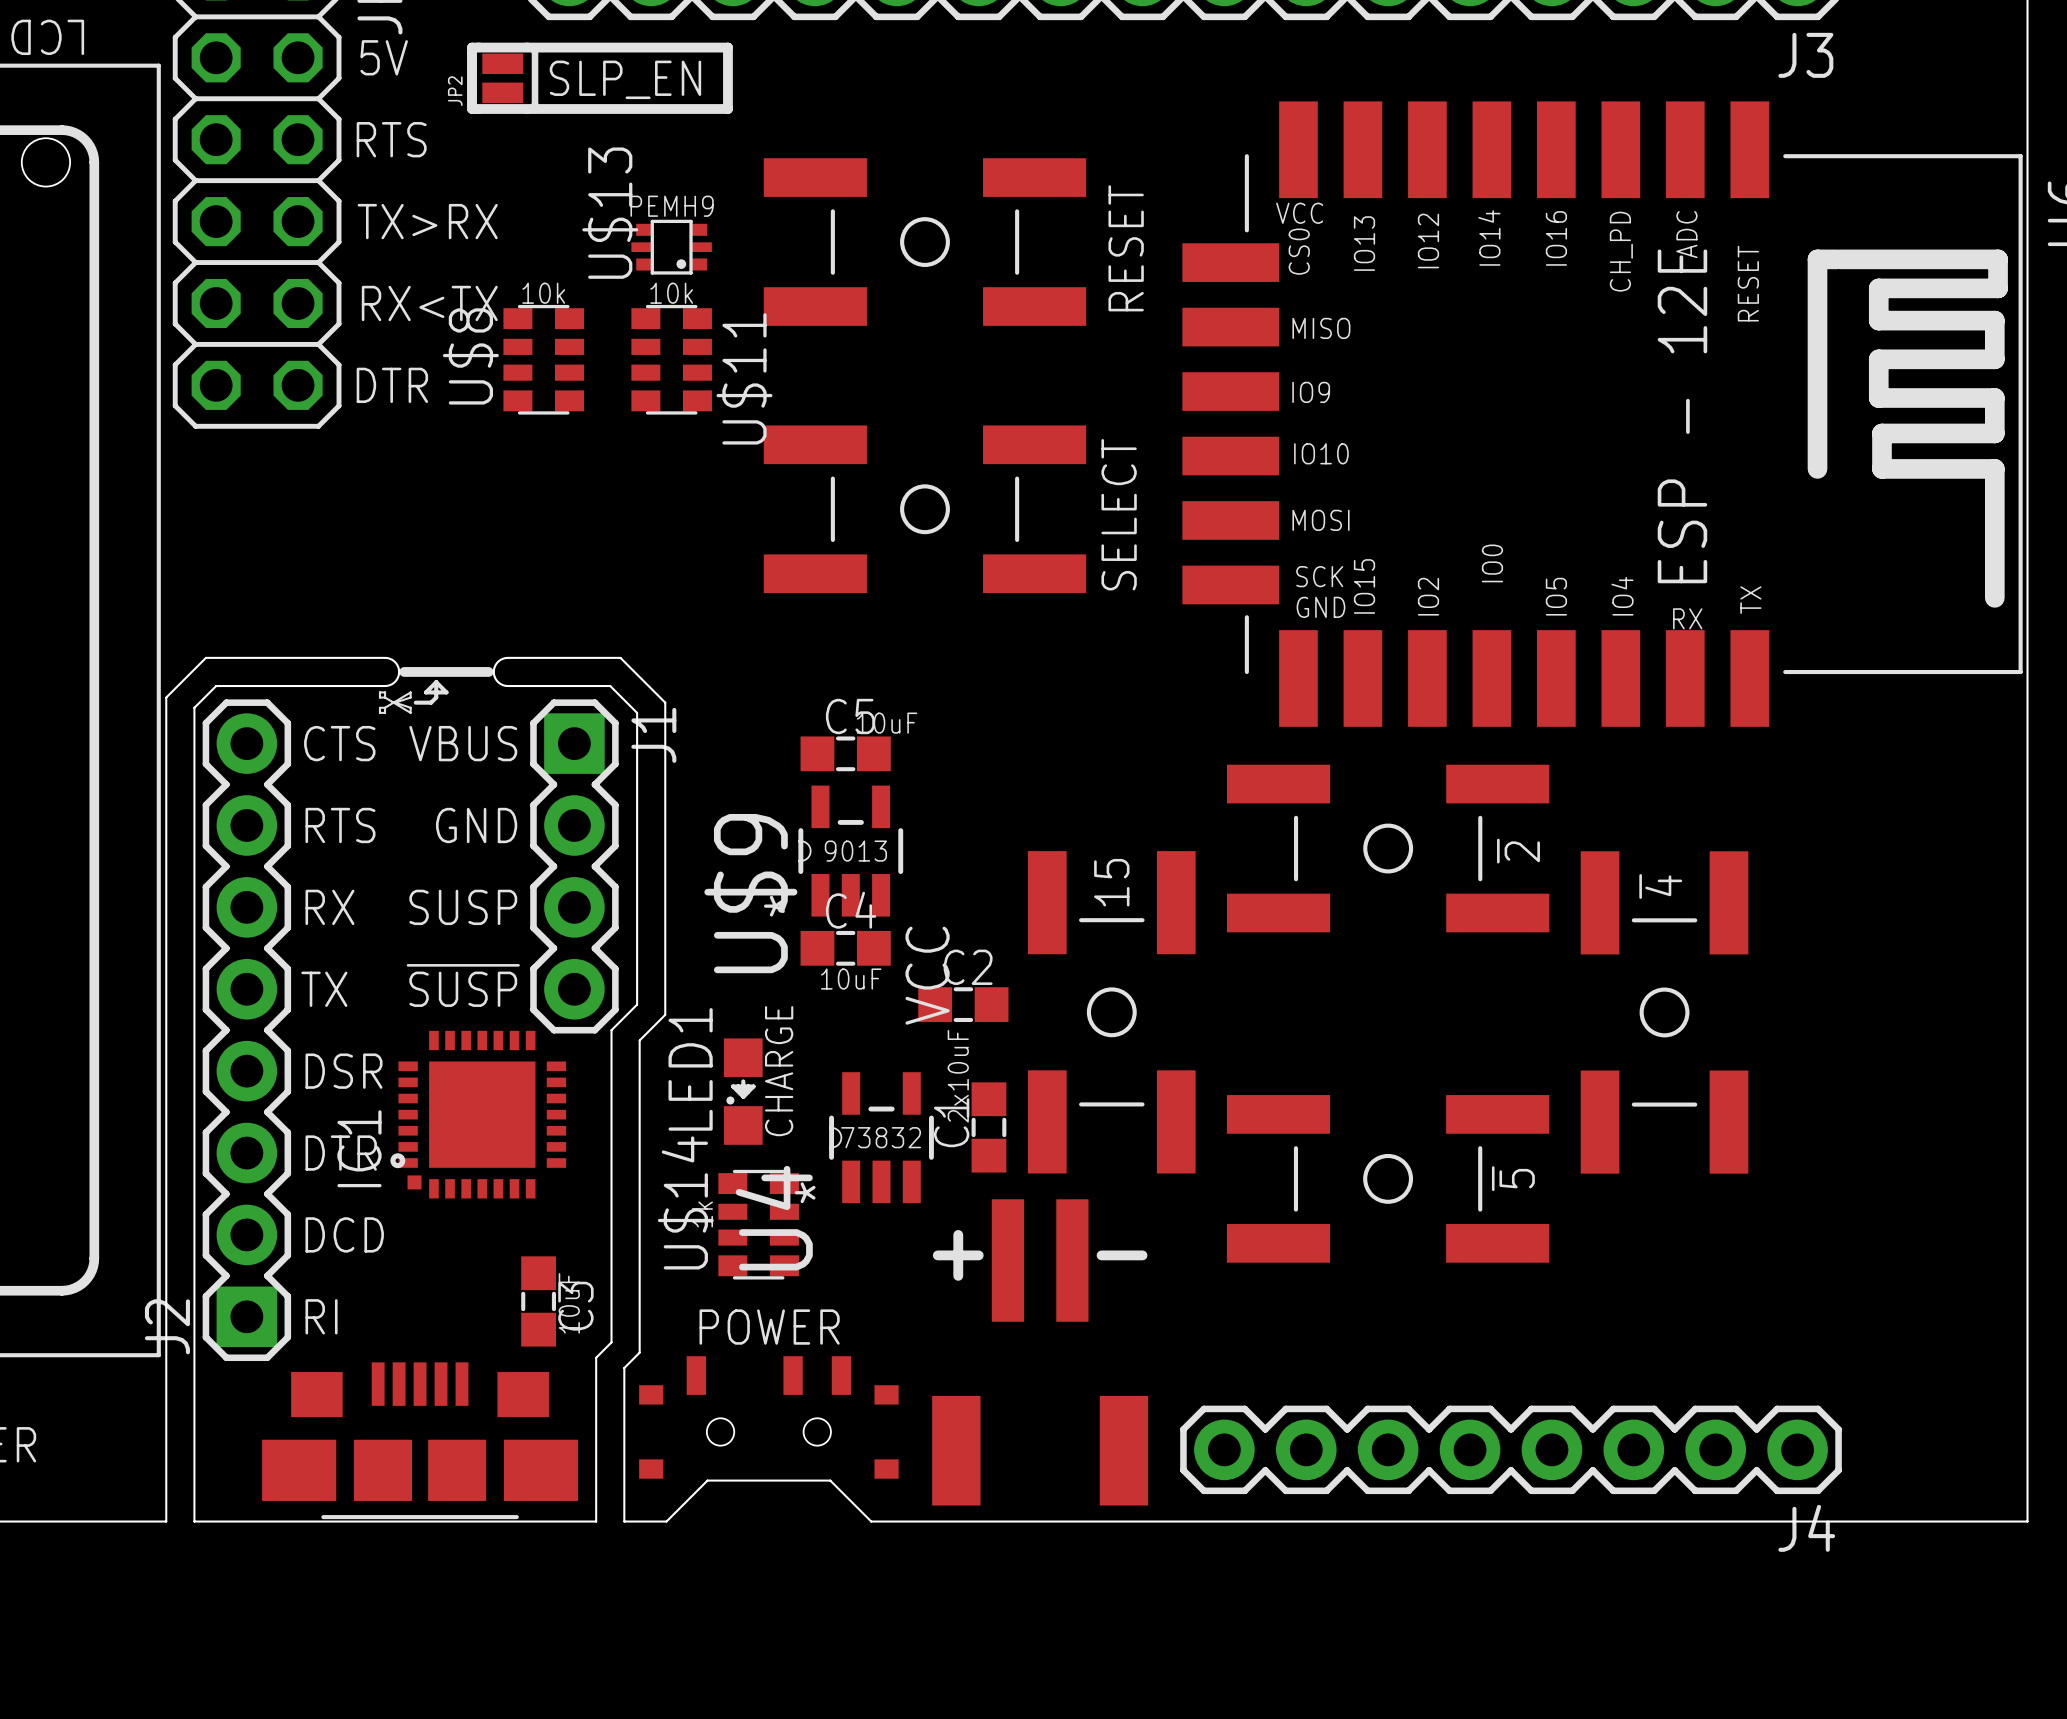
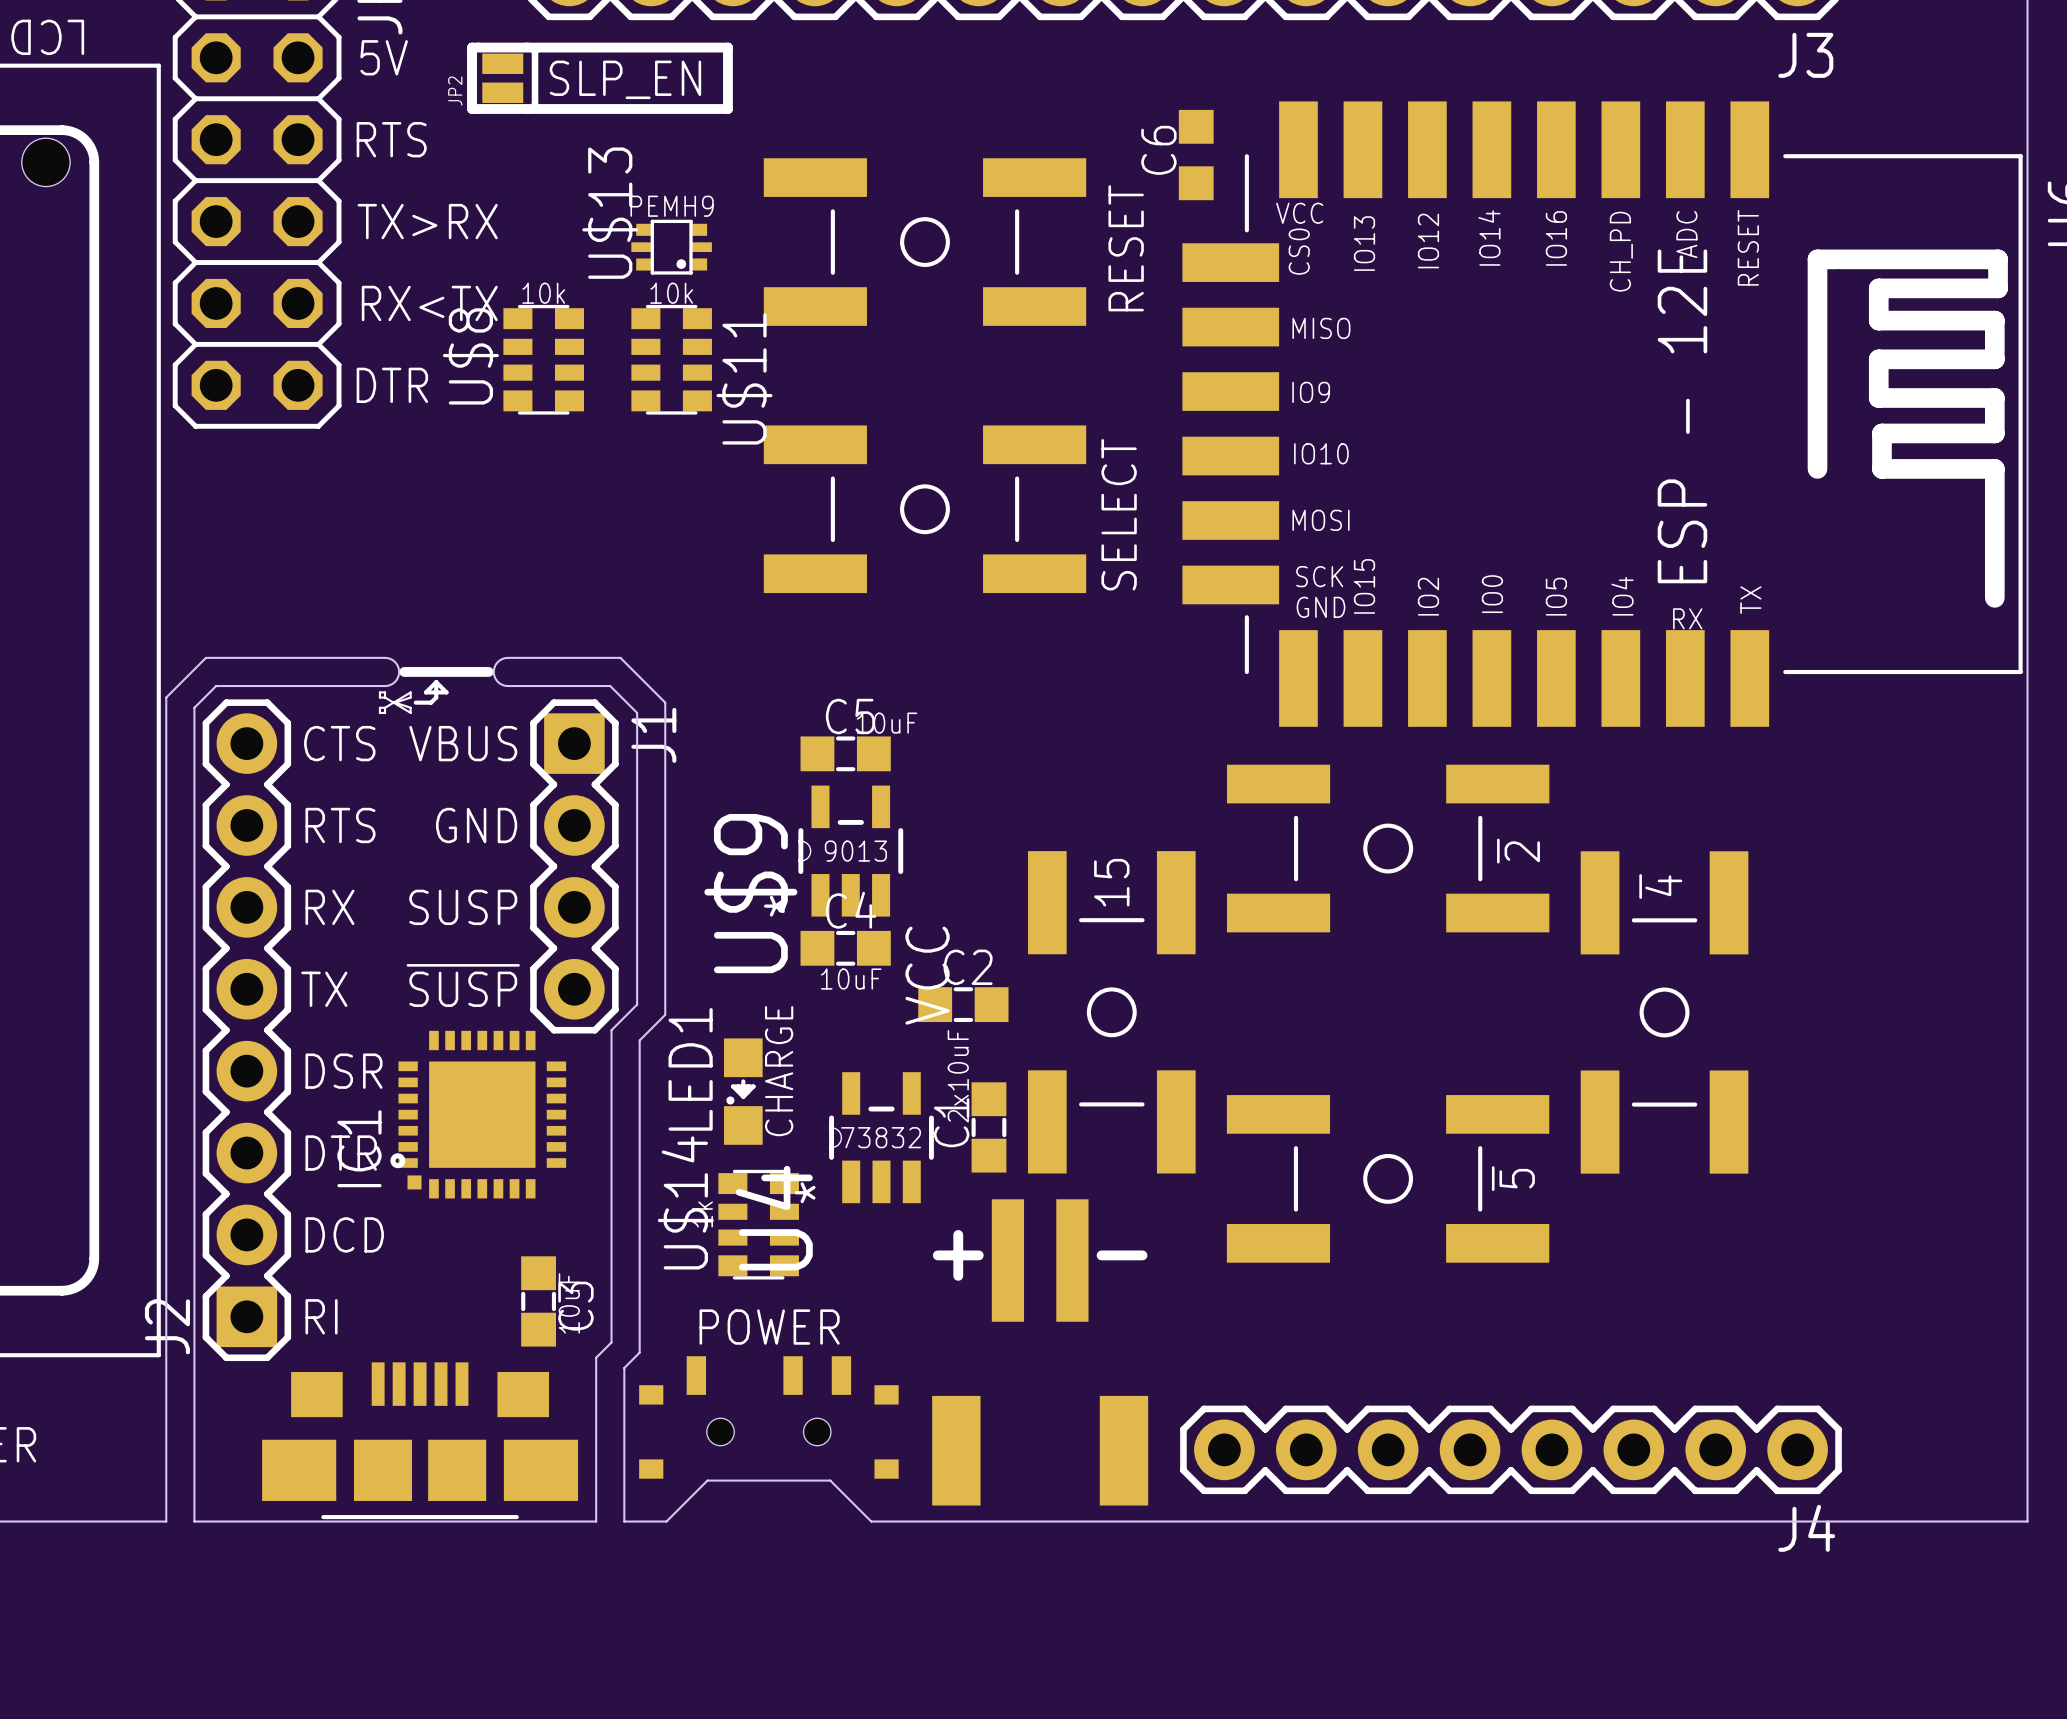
C6: none -> (1196, 155)
text position: RESET (1748, 283) -> RESET (1748, 247)
text position: IO0 (1492, 563) -> IO0 (1492, 594)

